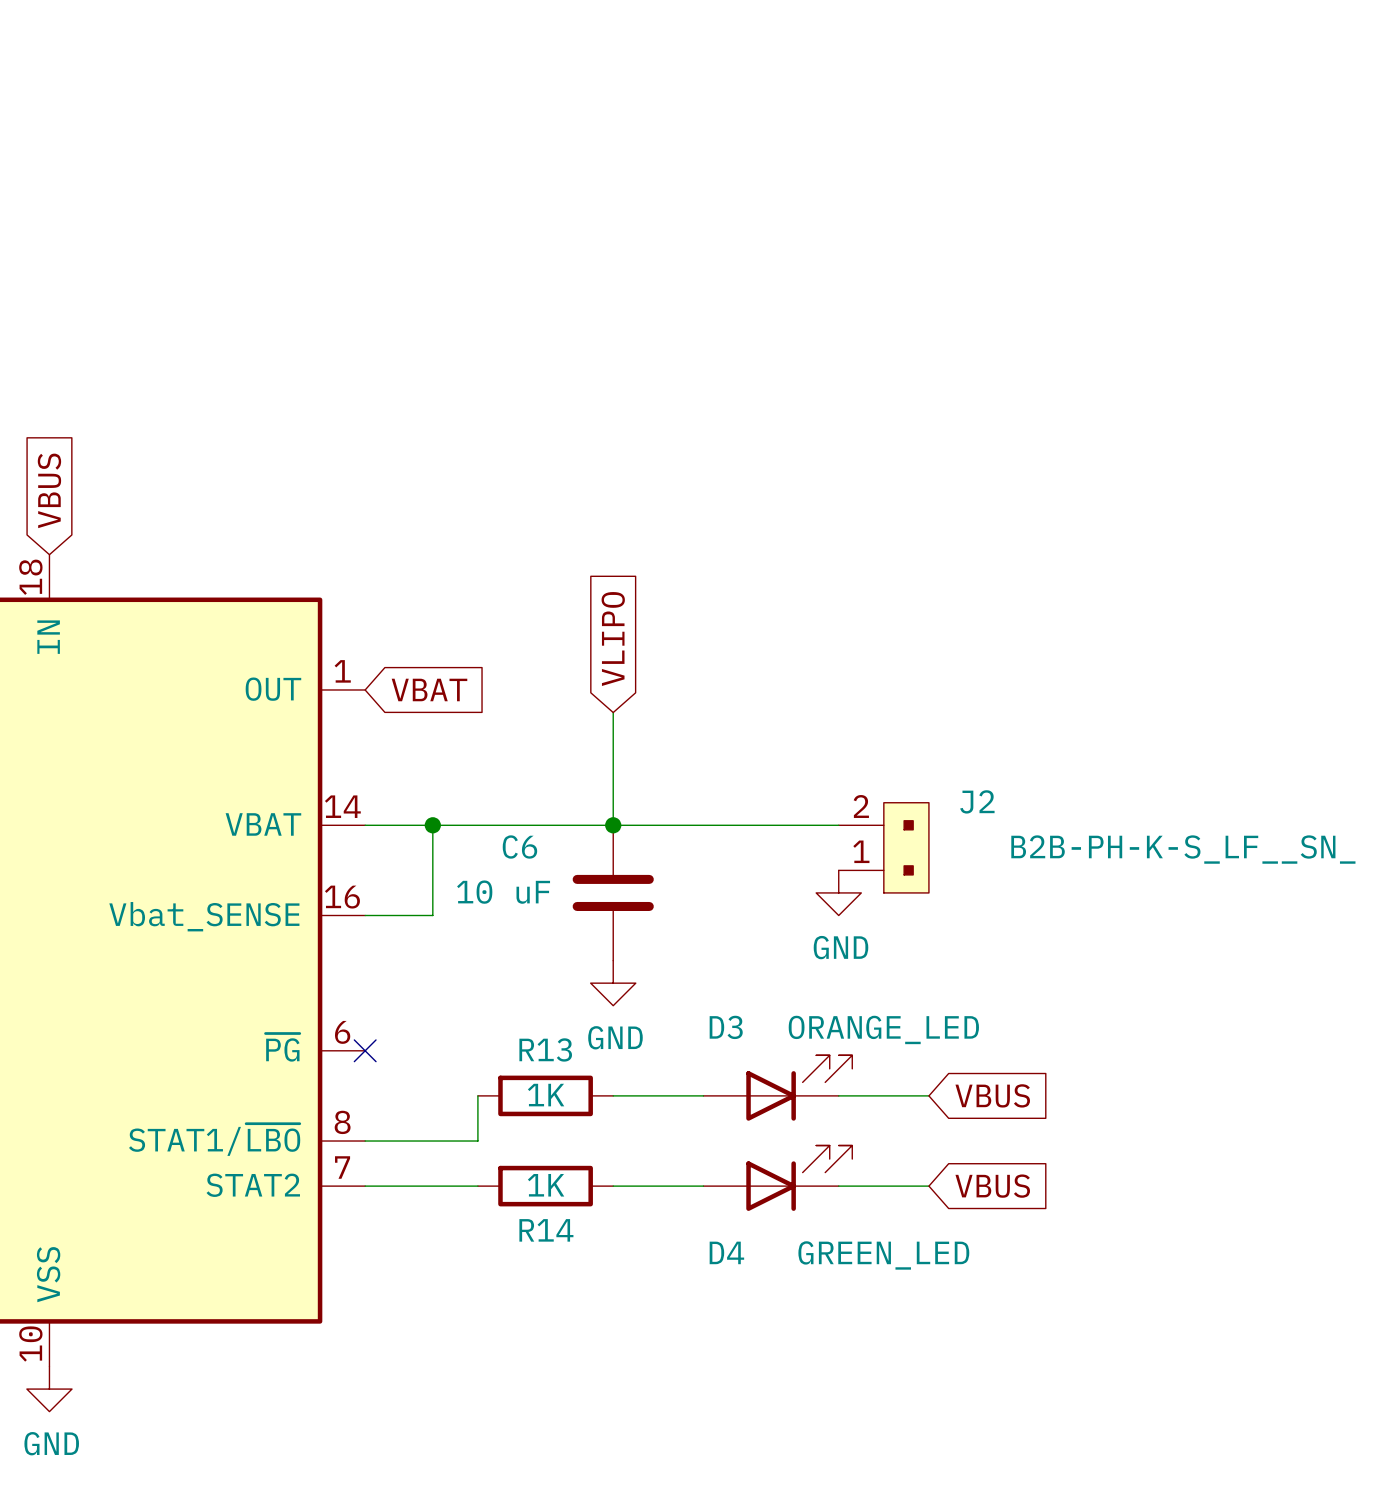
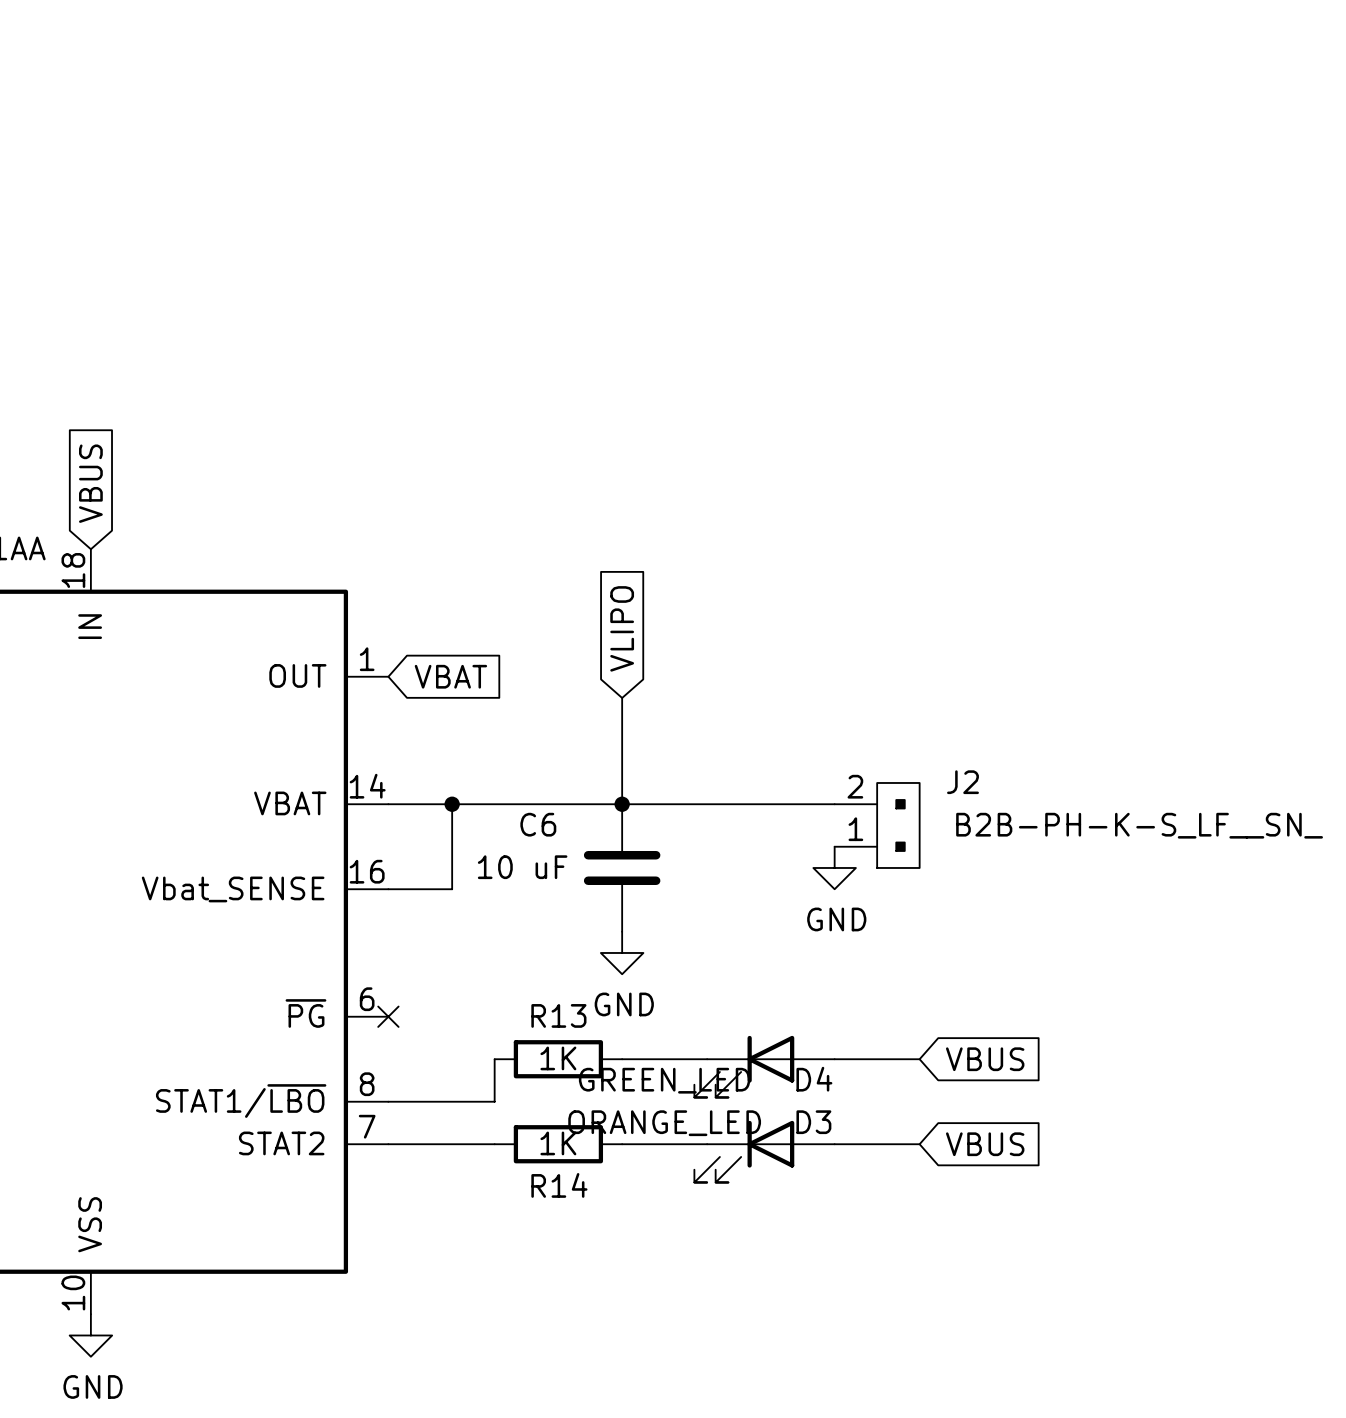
D3 rotation: 0° (799, 1088) -> 180° (744, 1066)
D4 rotation: 0° (799, 1178) -> 180° (744, 1151)

